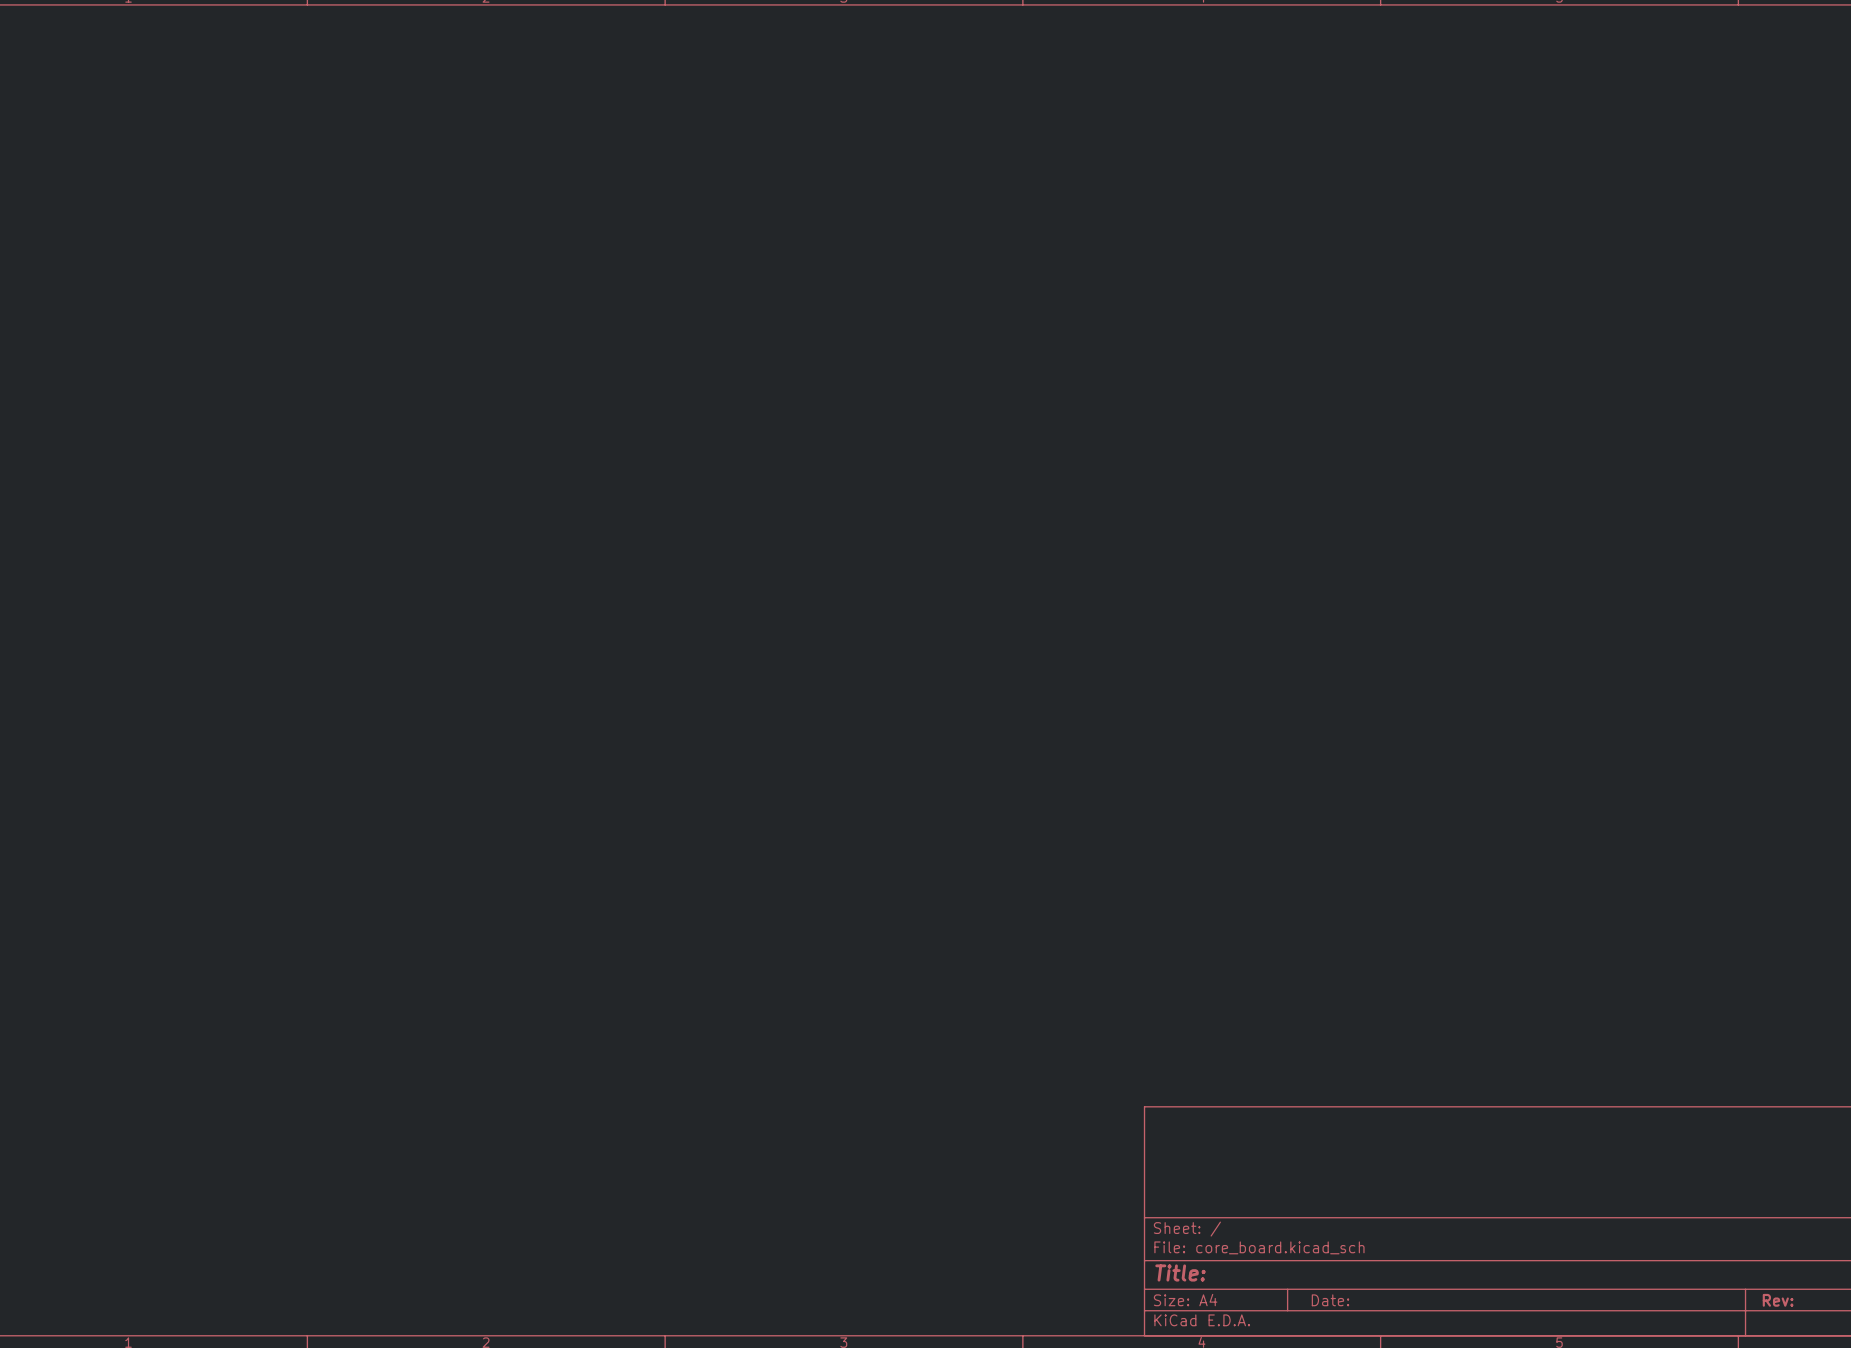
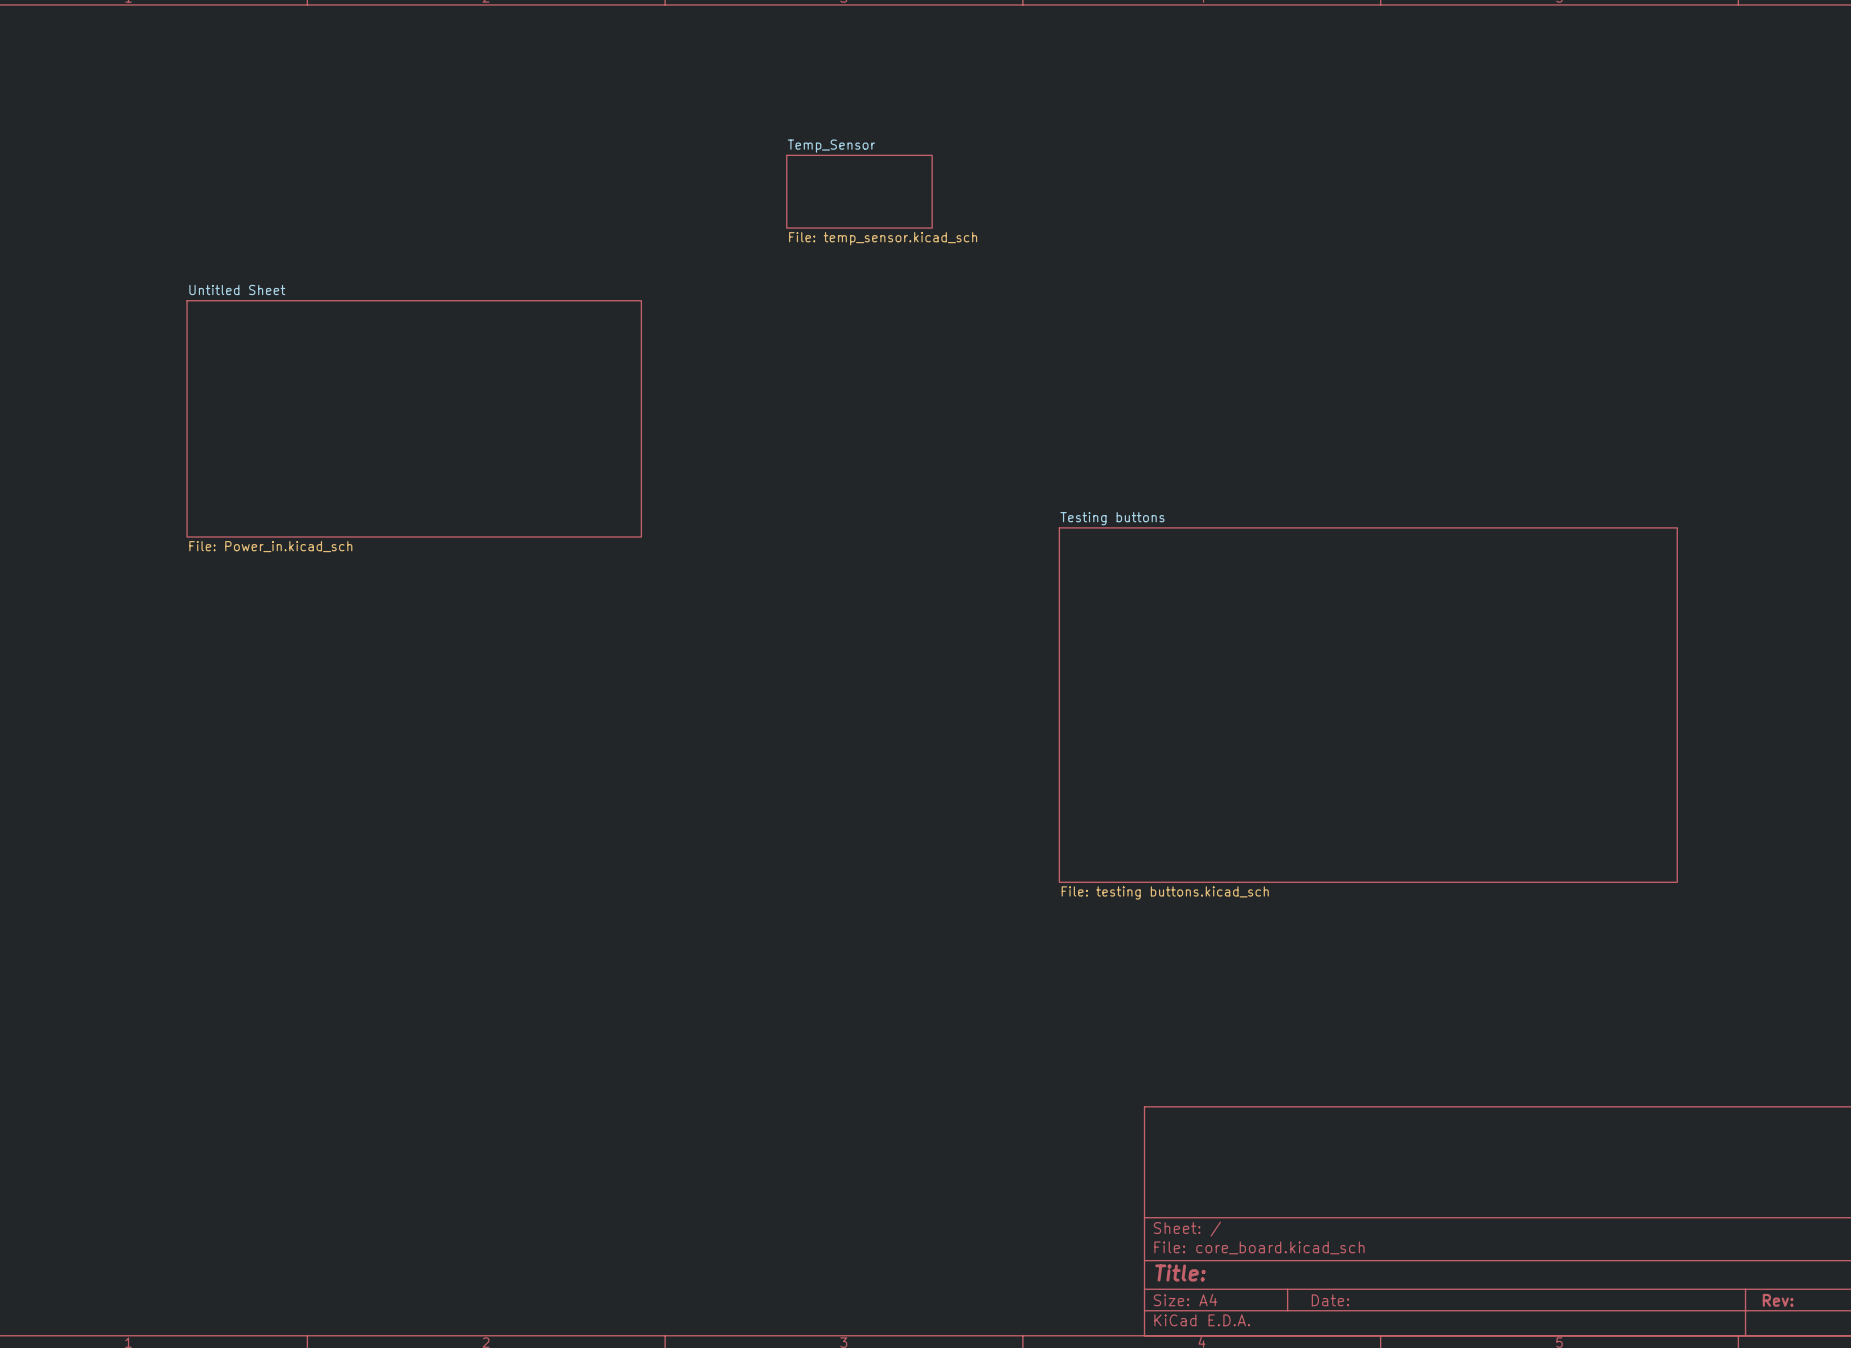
sheet Temp_Sensor: none -> File: temp_sensor.kicad_sch (859, 191)
sheet Untitled Sheet: none -> File: Power_in.kicad_sch (414, 418)
sheet Testing buttons: none -> File: testing buttons.kicad_sch (1368, 705)

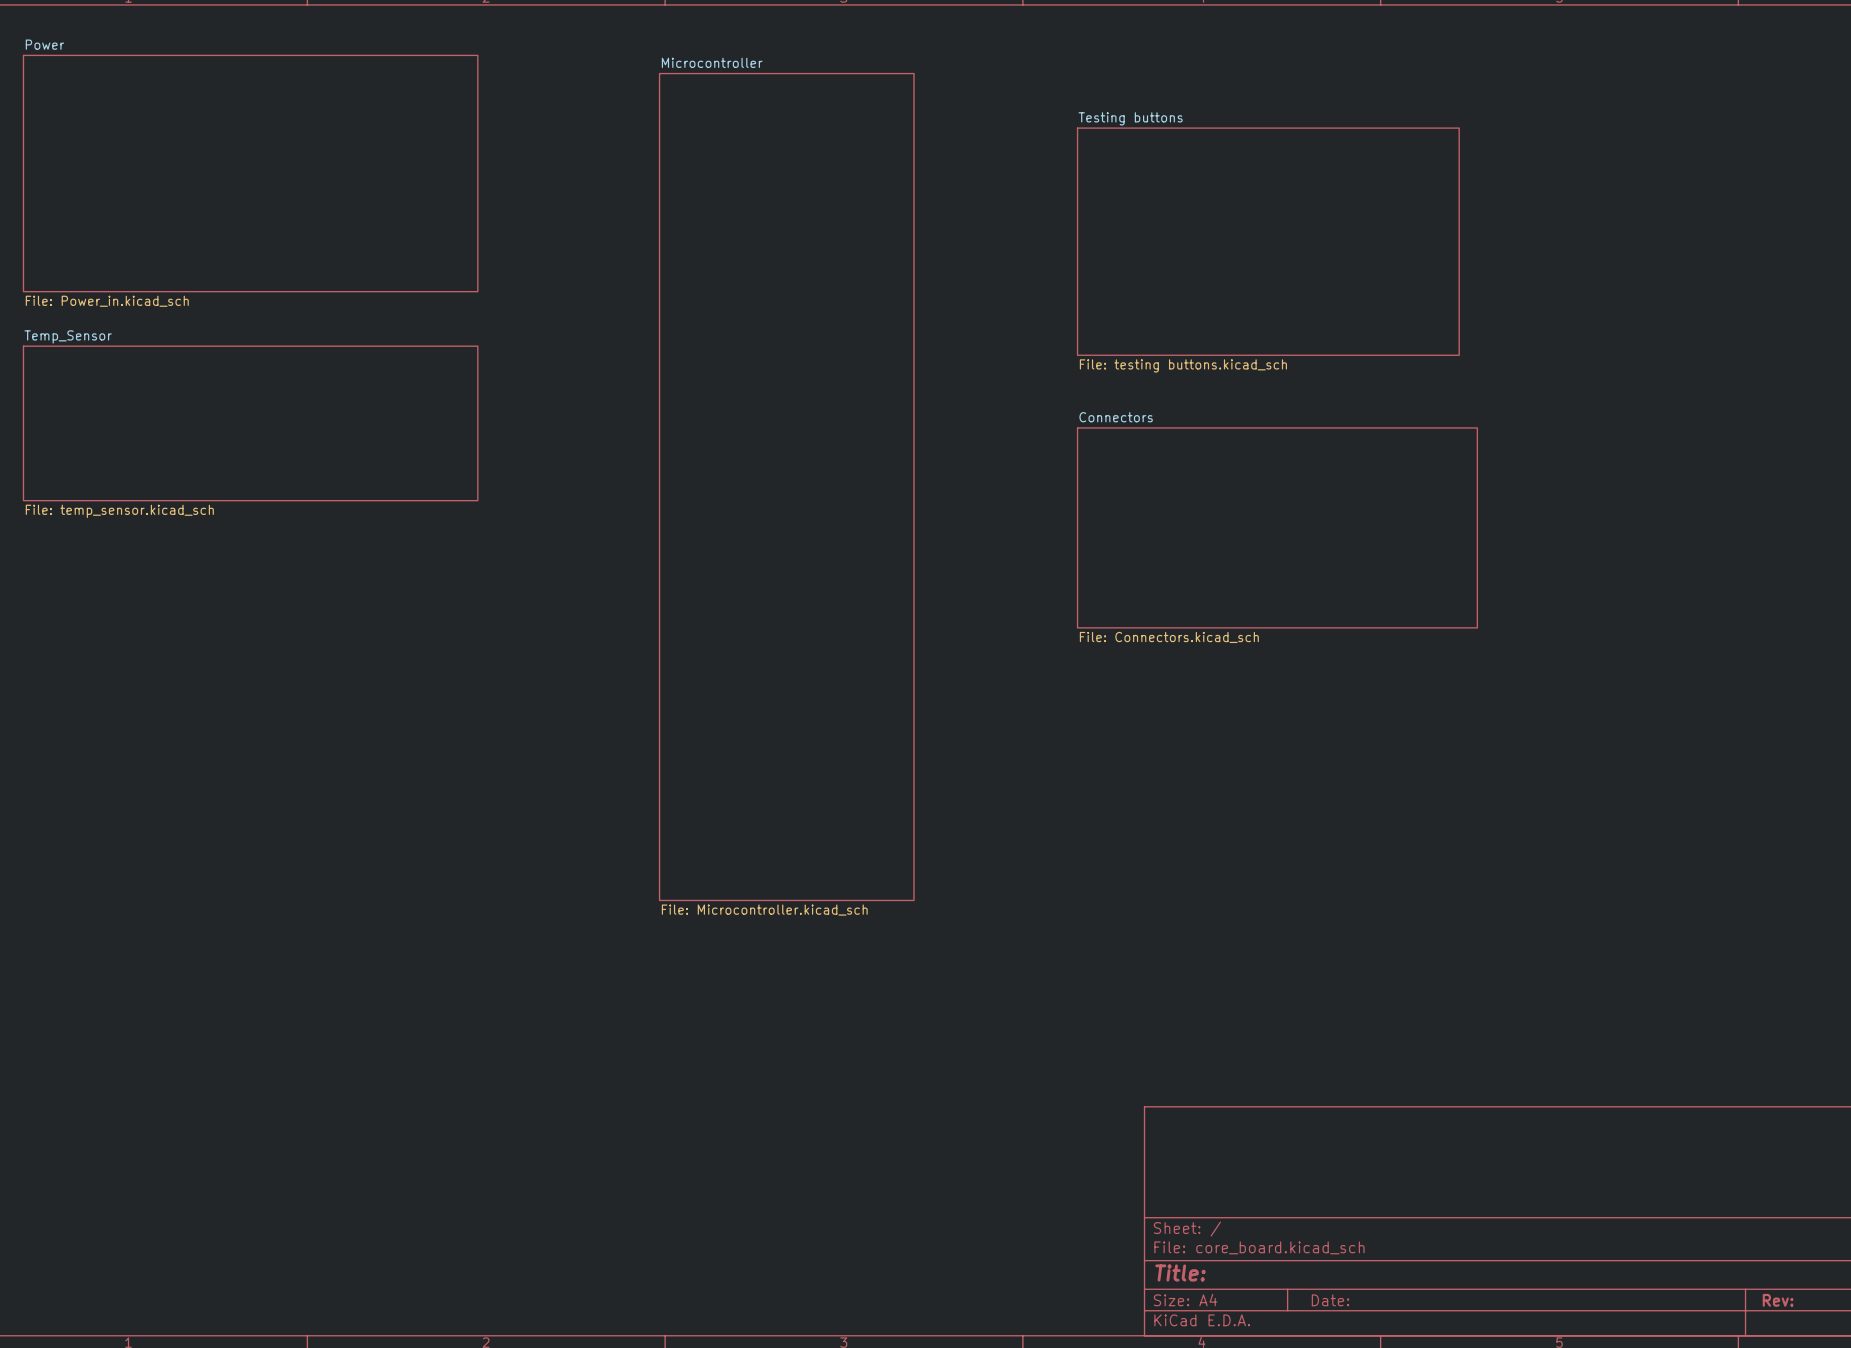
sheet Power: none -> File: Power_in.kicad_sch (250, 173)
sheet Temp_Sensor: File: temp_sensor.kicad_sch (859, 191) -> none
sheet Testing buttons: none -> File: testing buttons.kicad_sch (1268, 241)
sheet Untitled Sheet: File: Power_in.kicad_sch (414, 418) -> none
sheet Temp_Sensor: none -> File: temp_sensor.kicad_sch (250, 423)
sheet Microcontroller: none -> File: Microcontroller.kicad_sch (786, 487)
sheet Connectors: none -> File: Connectors.kicad_sch (1277, 527)
sheet Testing buttons: File: testing buttons.kicad_sch (1368, 705) -> none

